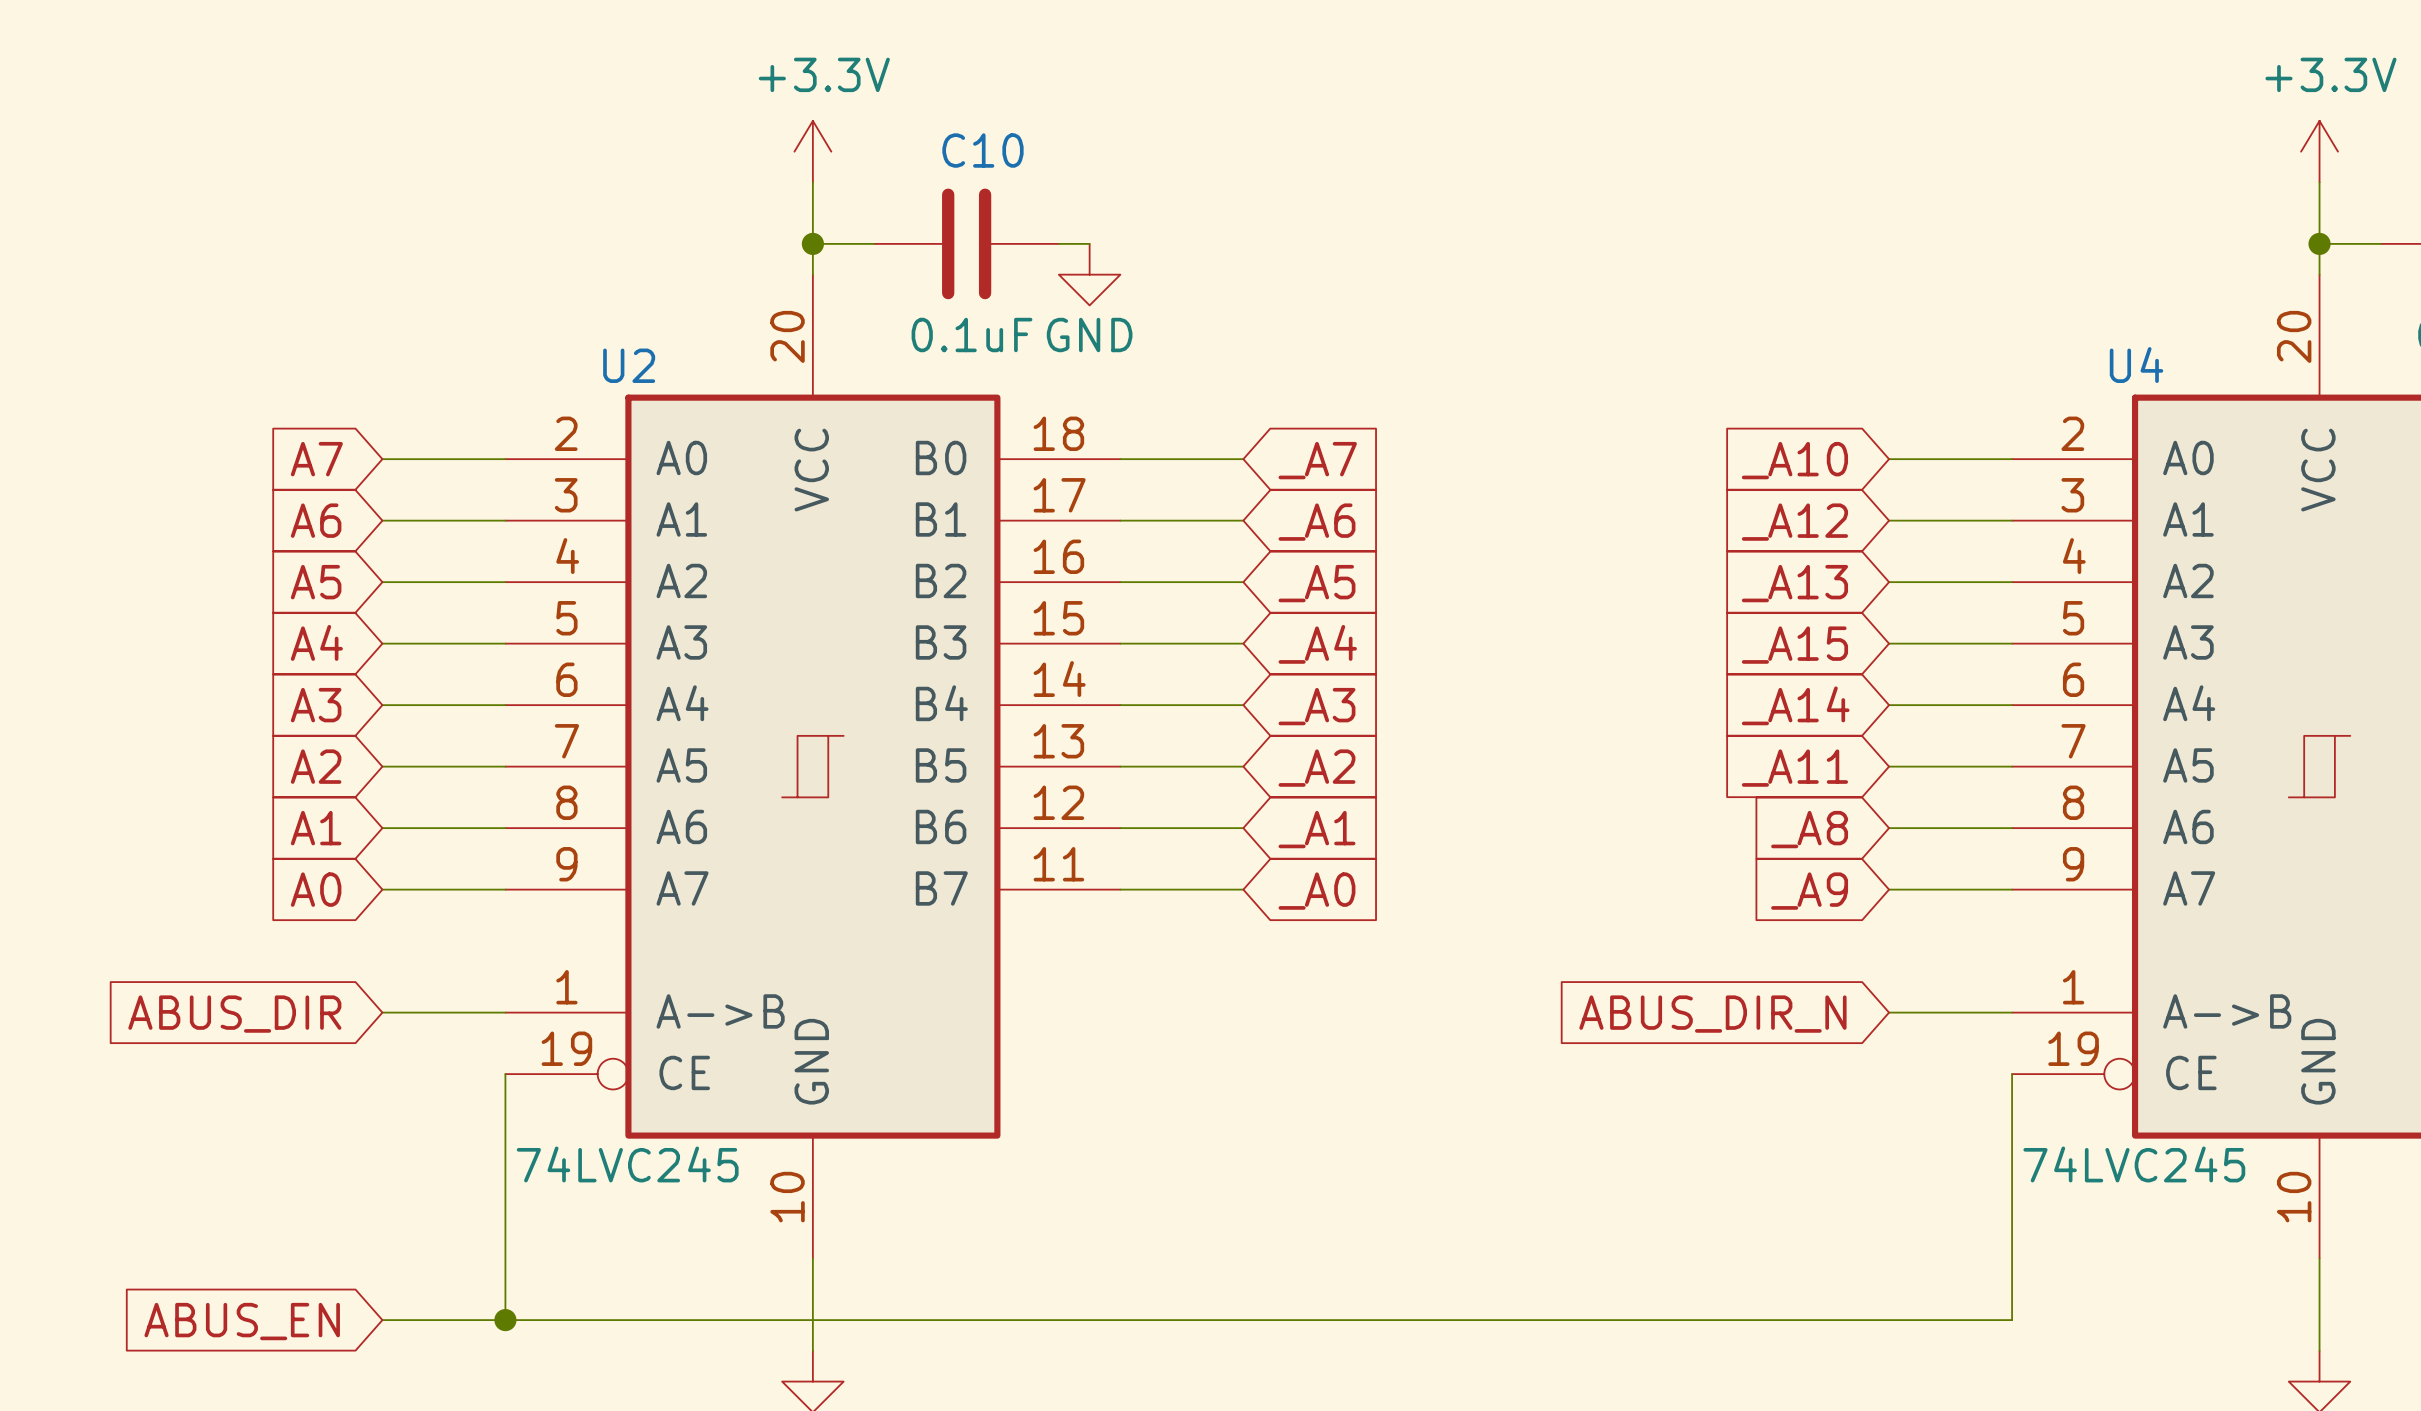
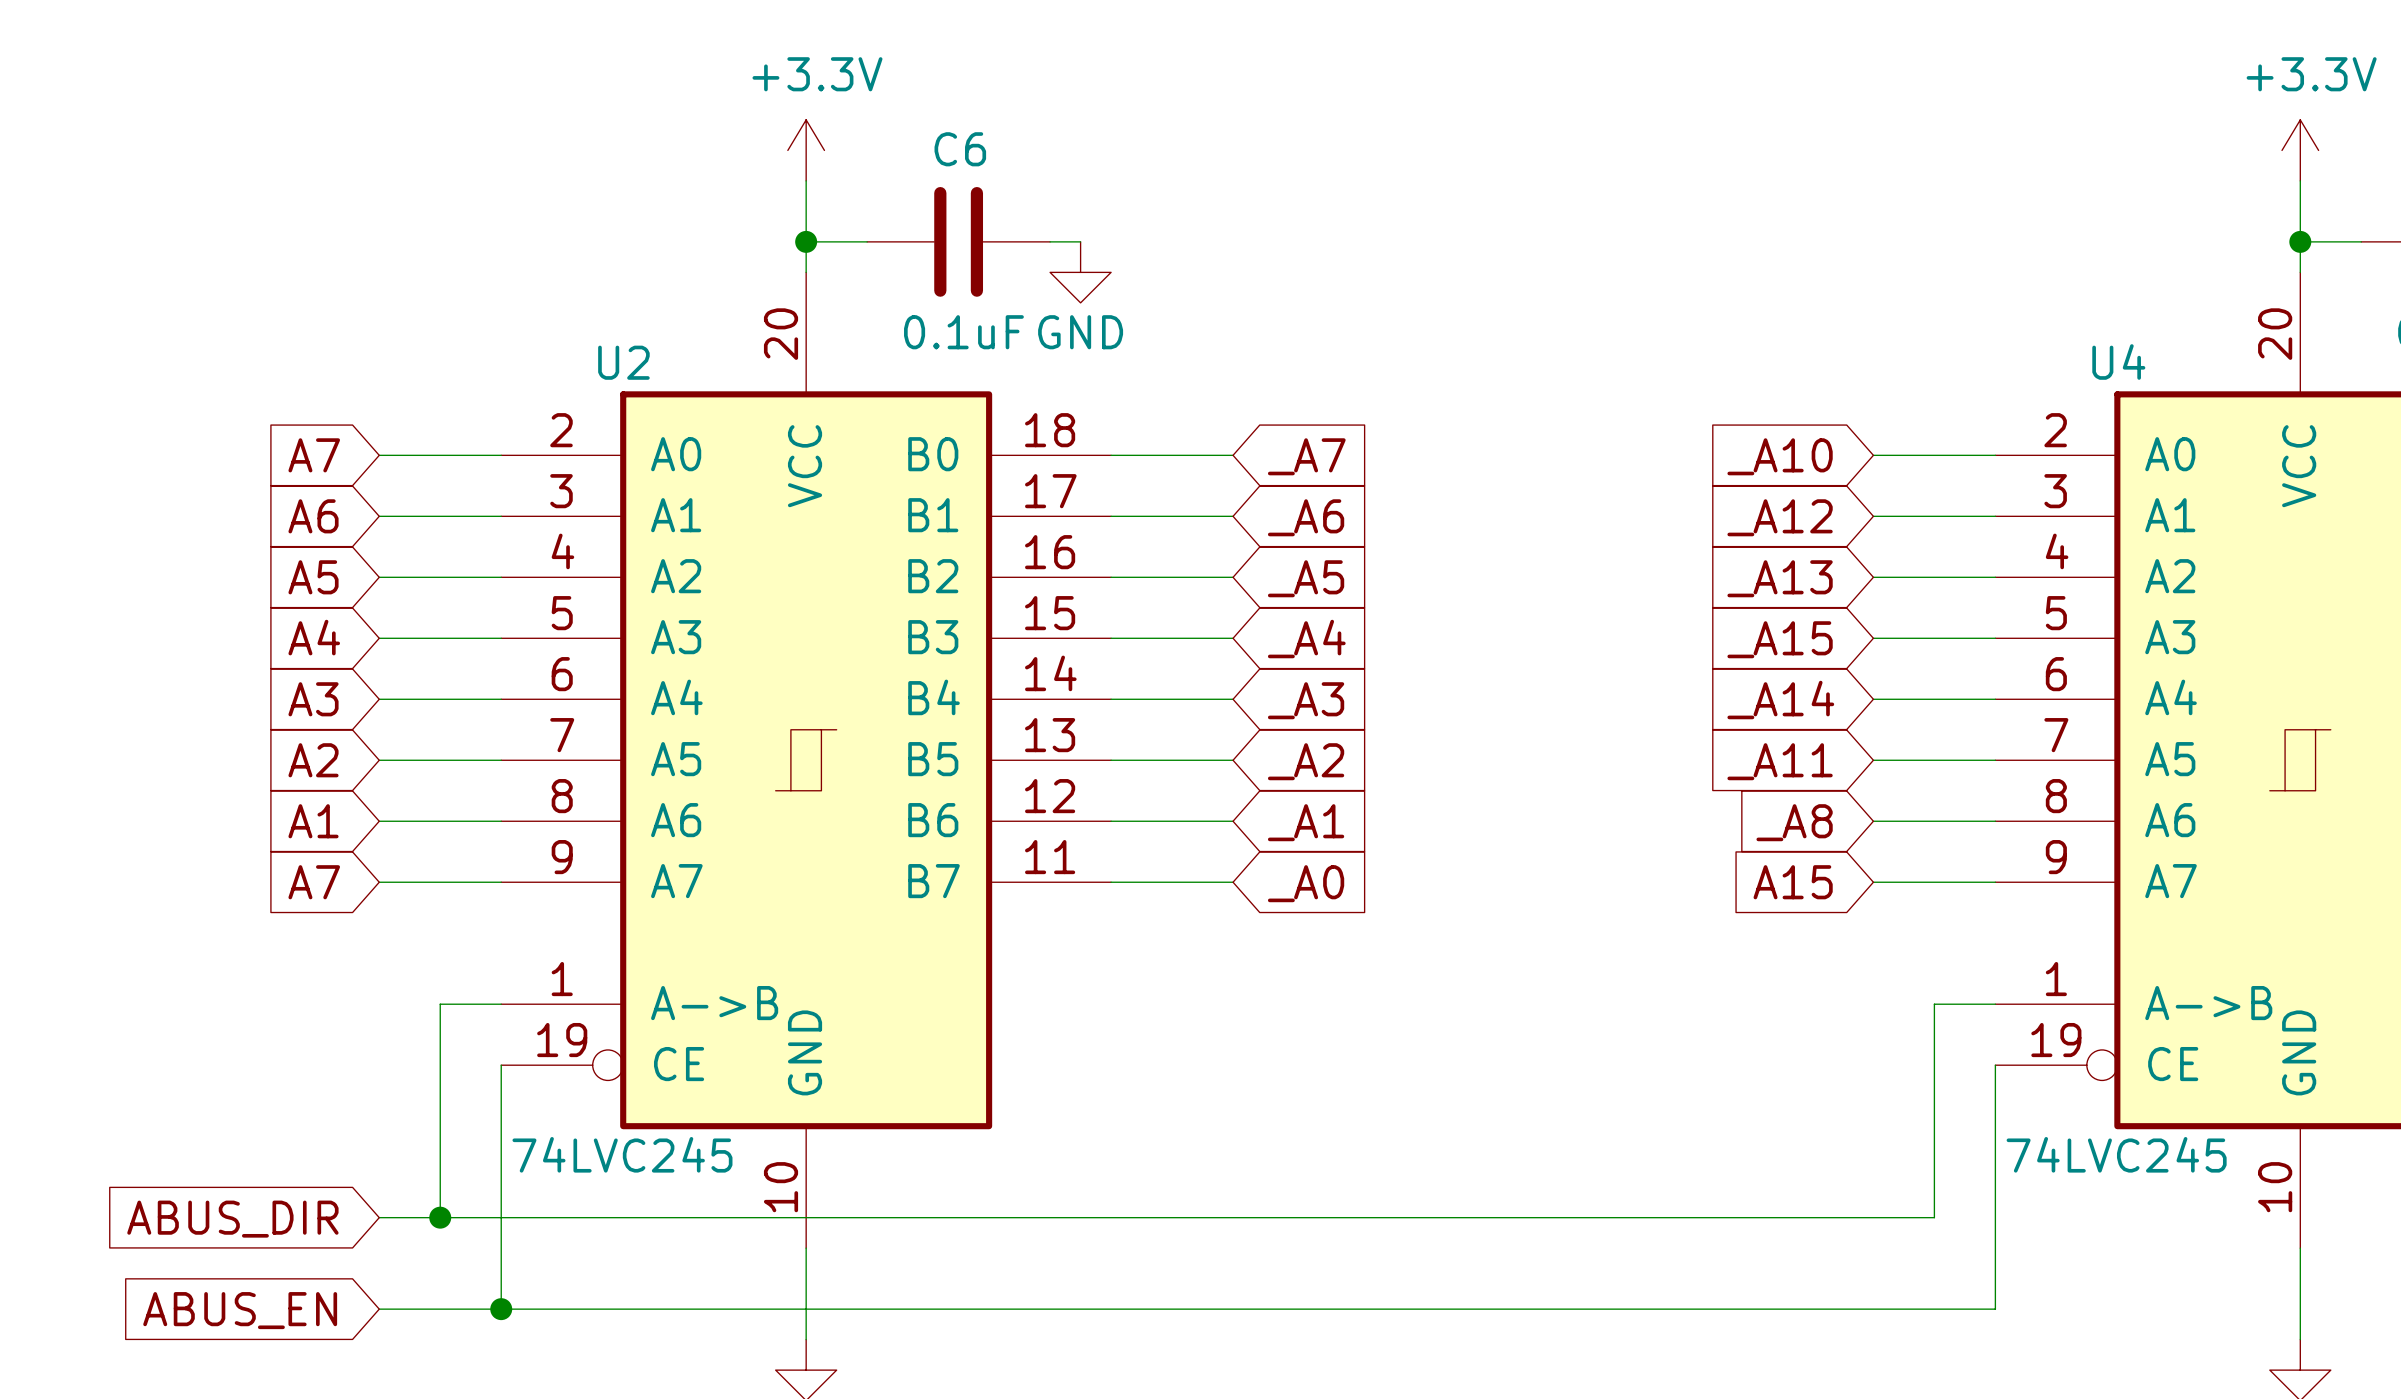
C10 name: C10 (982, 150) -> C6 (960, 149)
global label: A0 (316, 889) -> A7 (314, 882)
global label: _A9 (1809, 891) -> A15 (1793, 882)
wire: (382, 1012) (443, 1012) -> (440, 1217) (440, 1004)
wire: (1889, 1012) (1950, 1012) -> (379, 1217) (1934, 1217) (1934, 1004)
global label position: ABUS_DIR (234, 1014) -> ABUS_DIR (232, 1219)
global label: ABUS_DIR_N (1712, 1014) -> none
junction: none -> (440, 1217)

